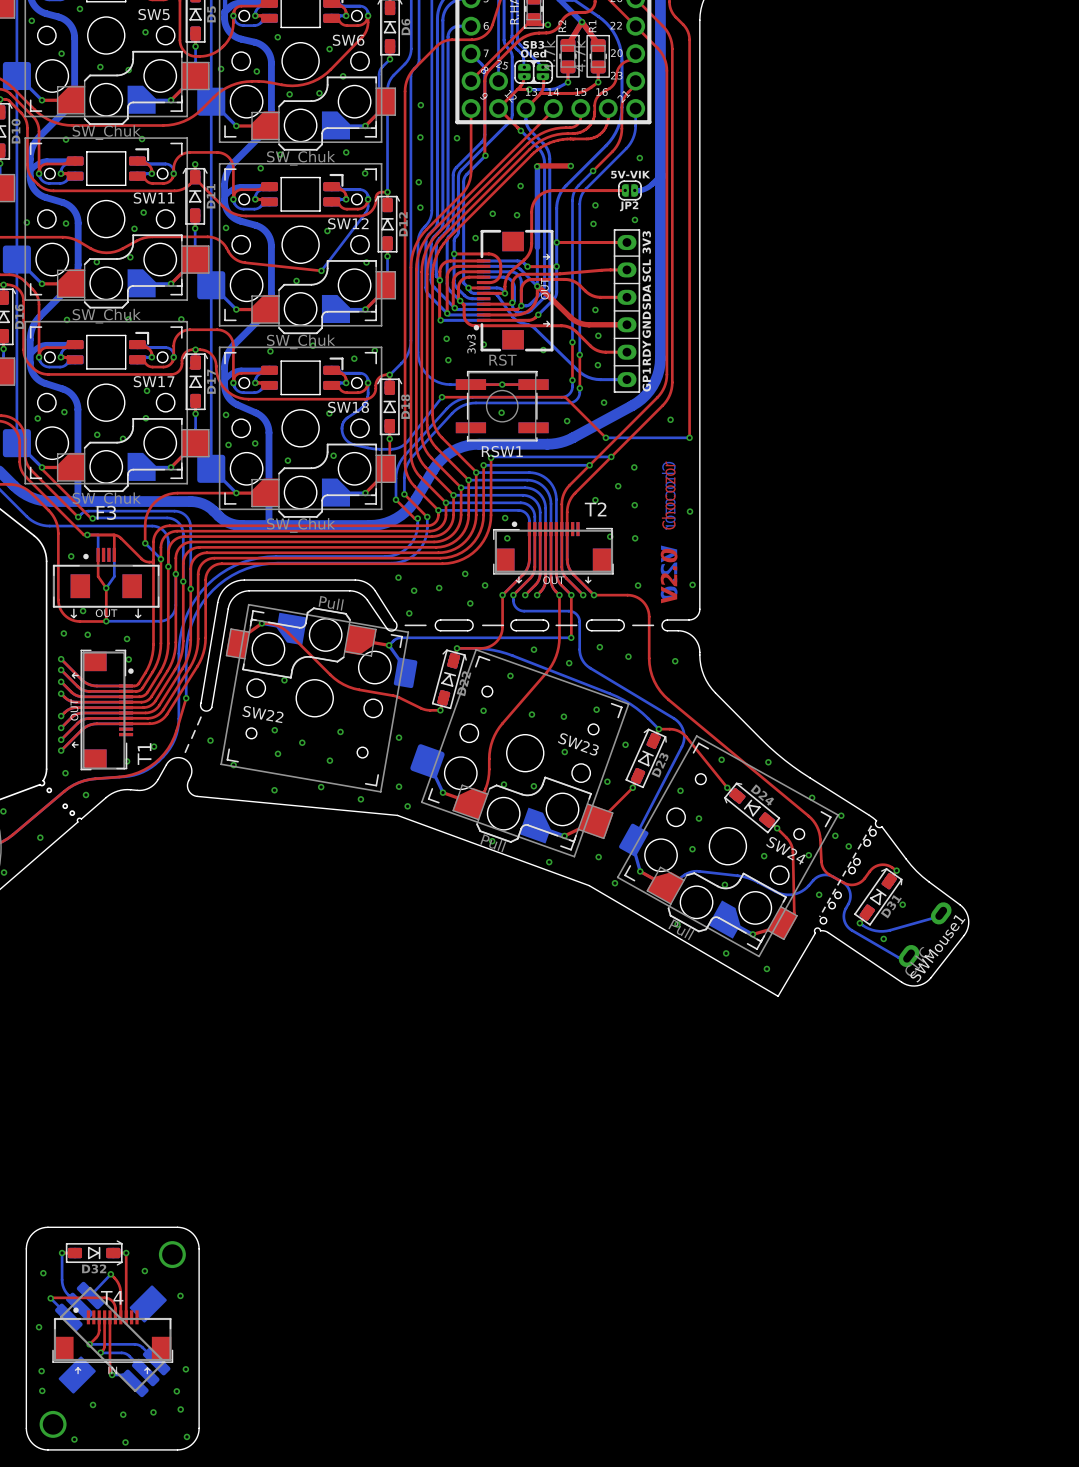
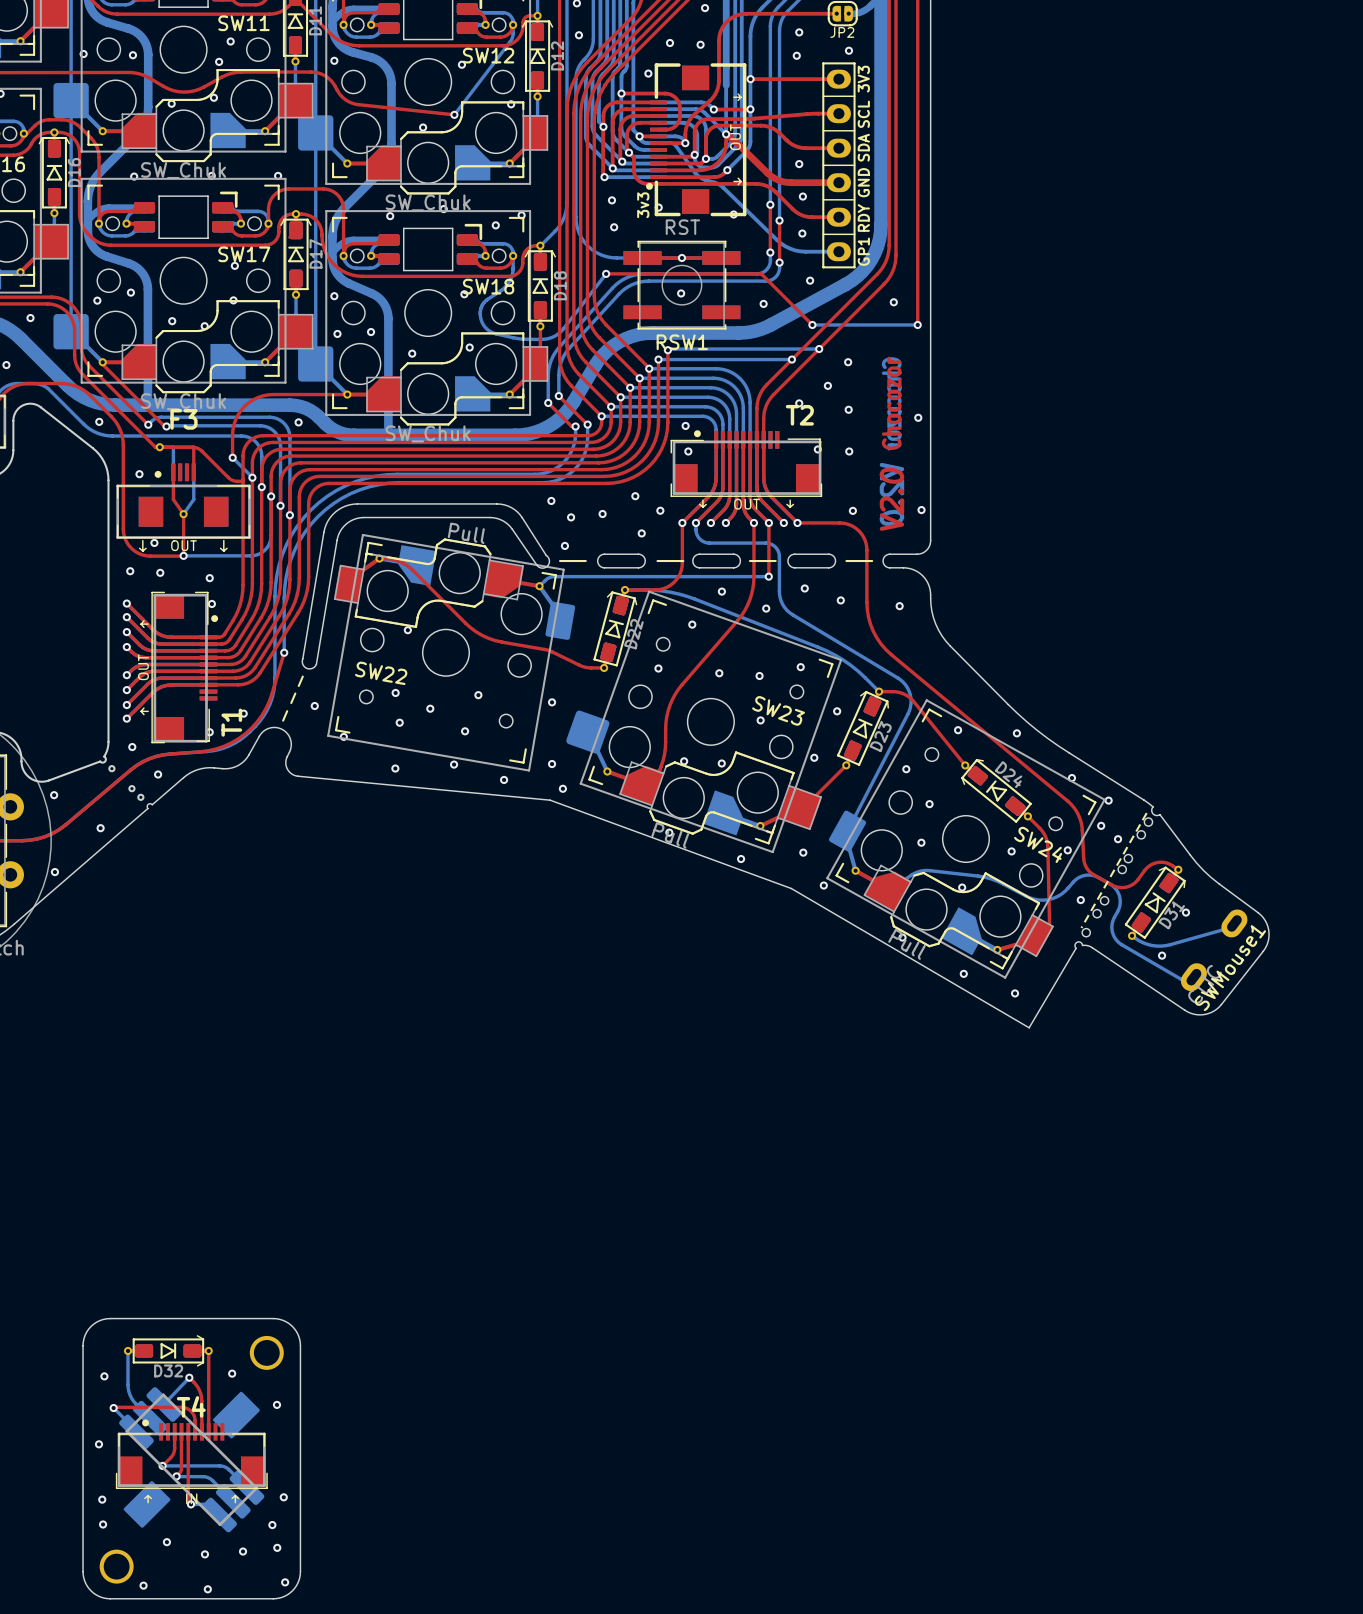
via: none -> (99, 421)
via: none -> (298, 422)

